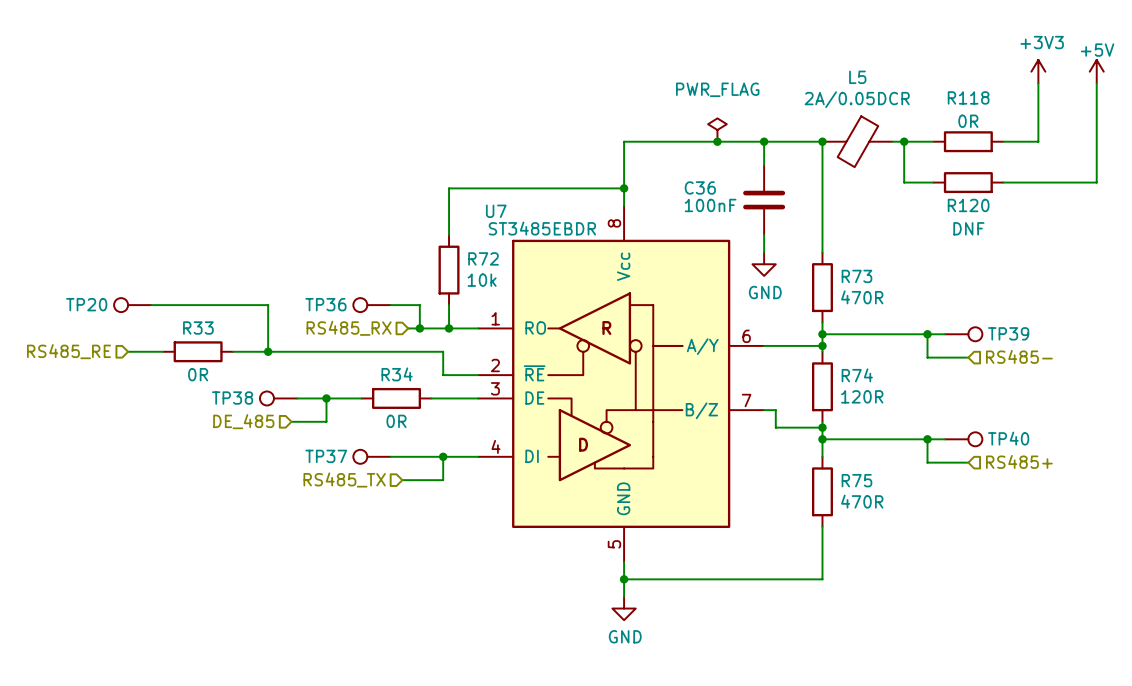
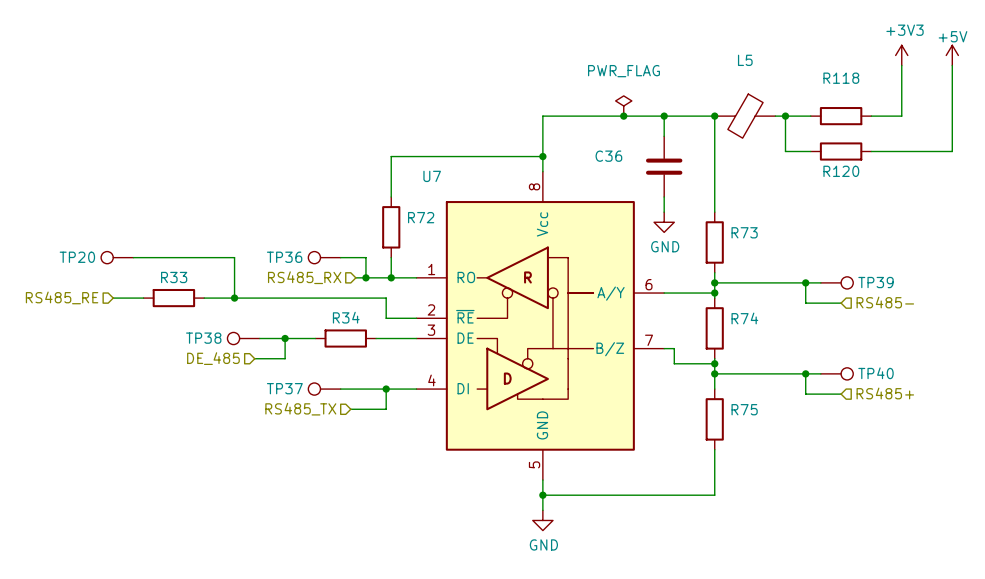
L5 value: 2A/0.05DCR (857, 99) -> none
R118 value: 0R (968, 121) -> none
C36 value: 100nF (710, 205) -> none
U7 value: ST3485EBDR (542, 228) -> none
R120 value: DNF (968, 228) -> none
R72 value: 10k (482, 280) -> none
R73 value: 470R (862, 297) -> none
R33 value: 0R (198, 374) -> none
R74 value: 120R (862, 396) -> none
R34 value: 0R (396, 421) -> none
R75 value: 470R (862, 501) -> none

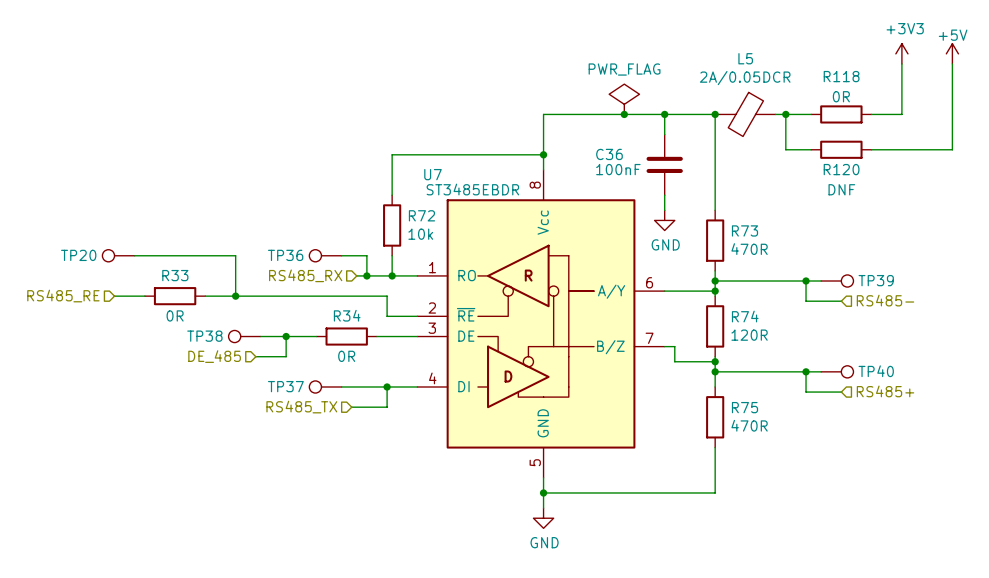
L5 value: none -> 2A/0.05DCR (745, 78)
power symbol shape: [615, 95, 632, 117] -> [609, 84, 640, 115]
R118 value: none -> 0R (841, 96)
C36 value: none -> 100nF (618, 169)
U7 value: none -> ST3485EBDR (472, 189)
R120 value: none -> DNF (841, 189)
R72 value: none -> 10k (420, 234)
R73 value: none -> 470R (749, 249)
R33 value: none -> 0R (175, 315)
R74 value: none -> 120R (749, 335)
R34 value: none -> 0R (346, 356)
R75 value: none -> 470R (749, 425)

